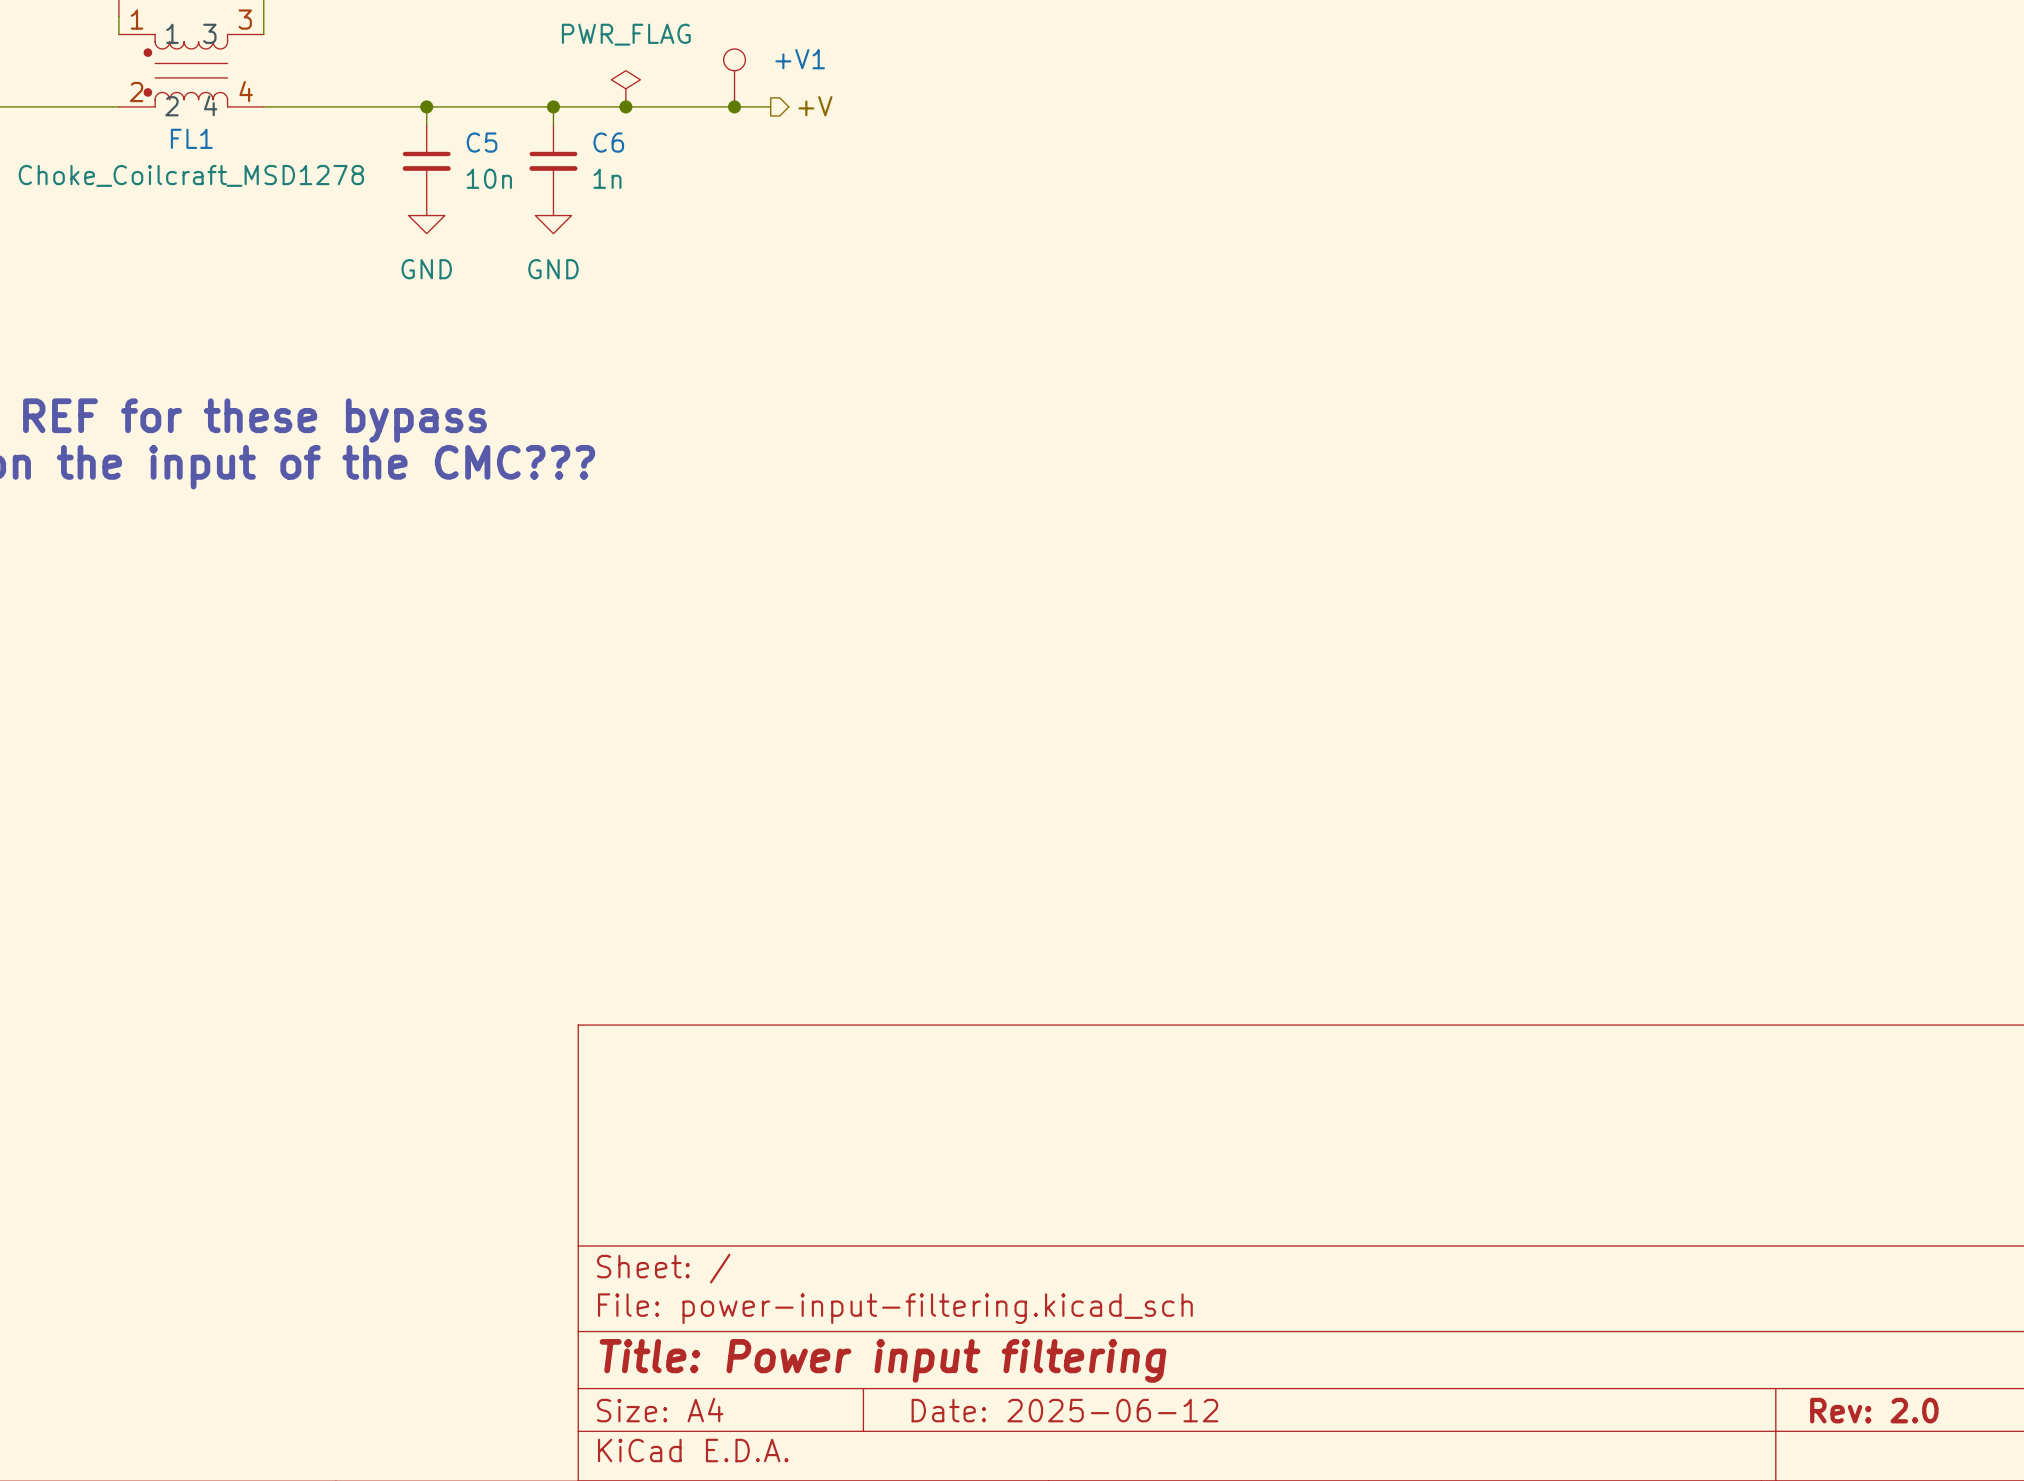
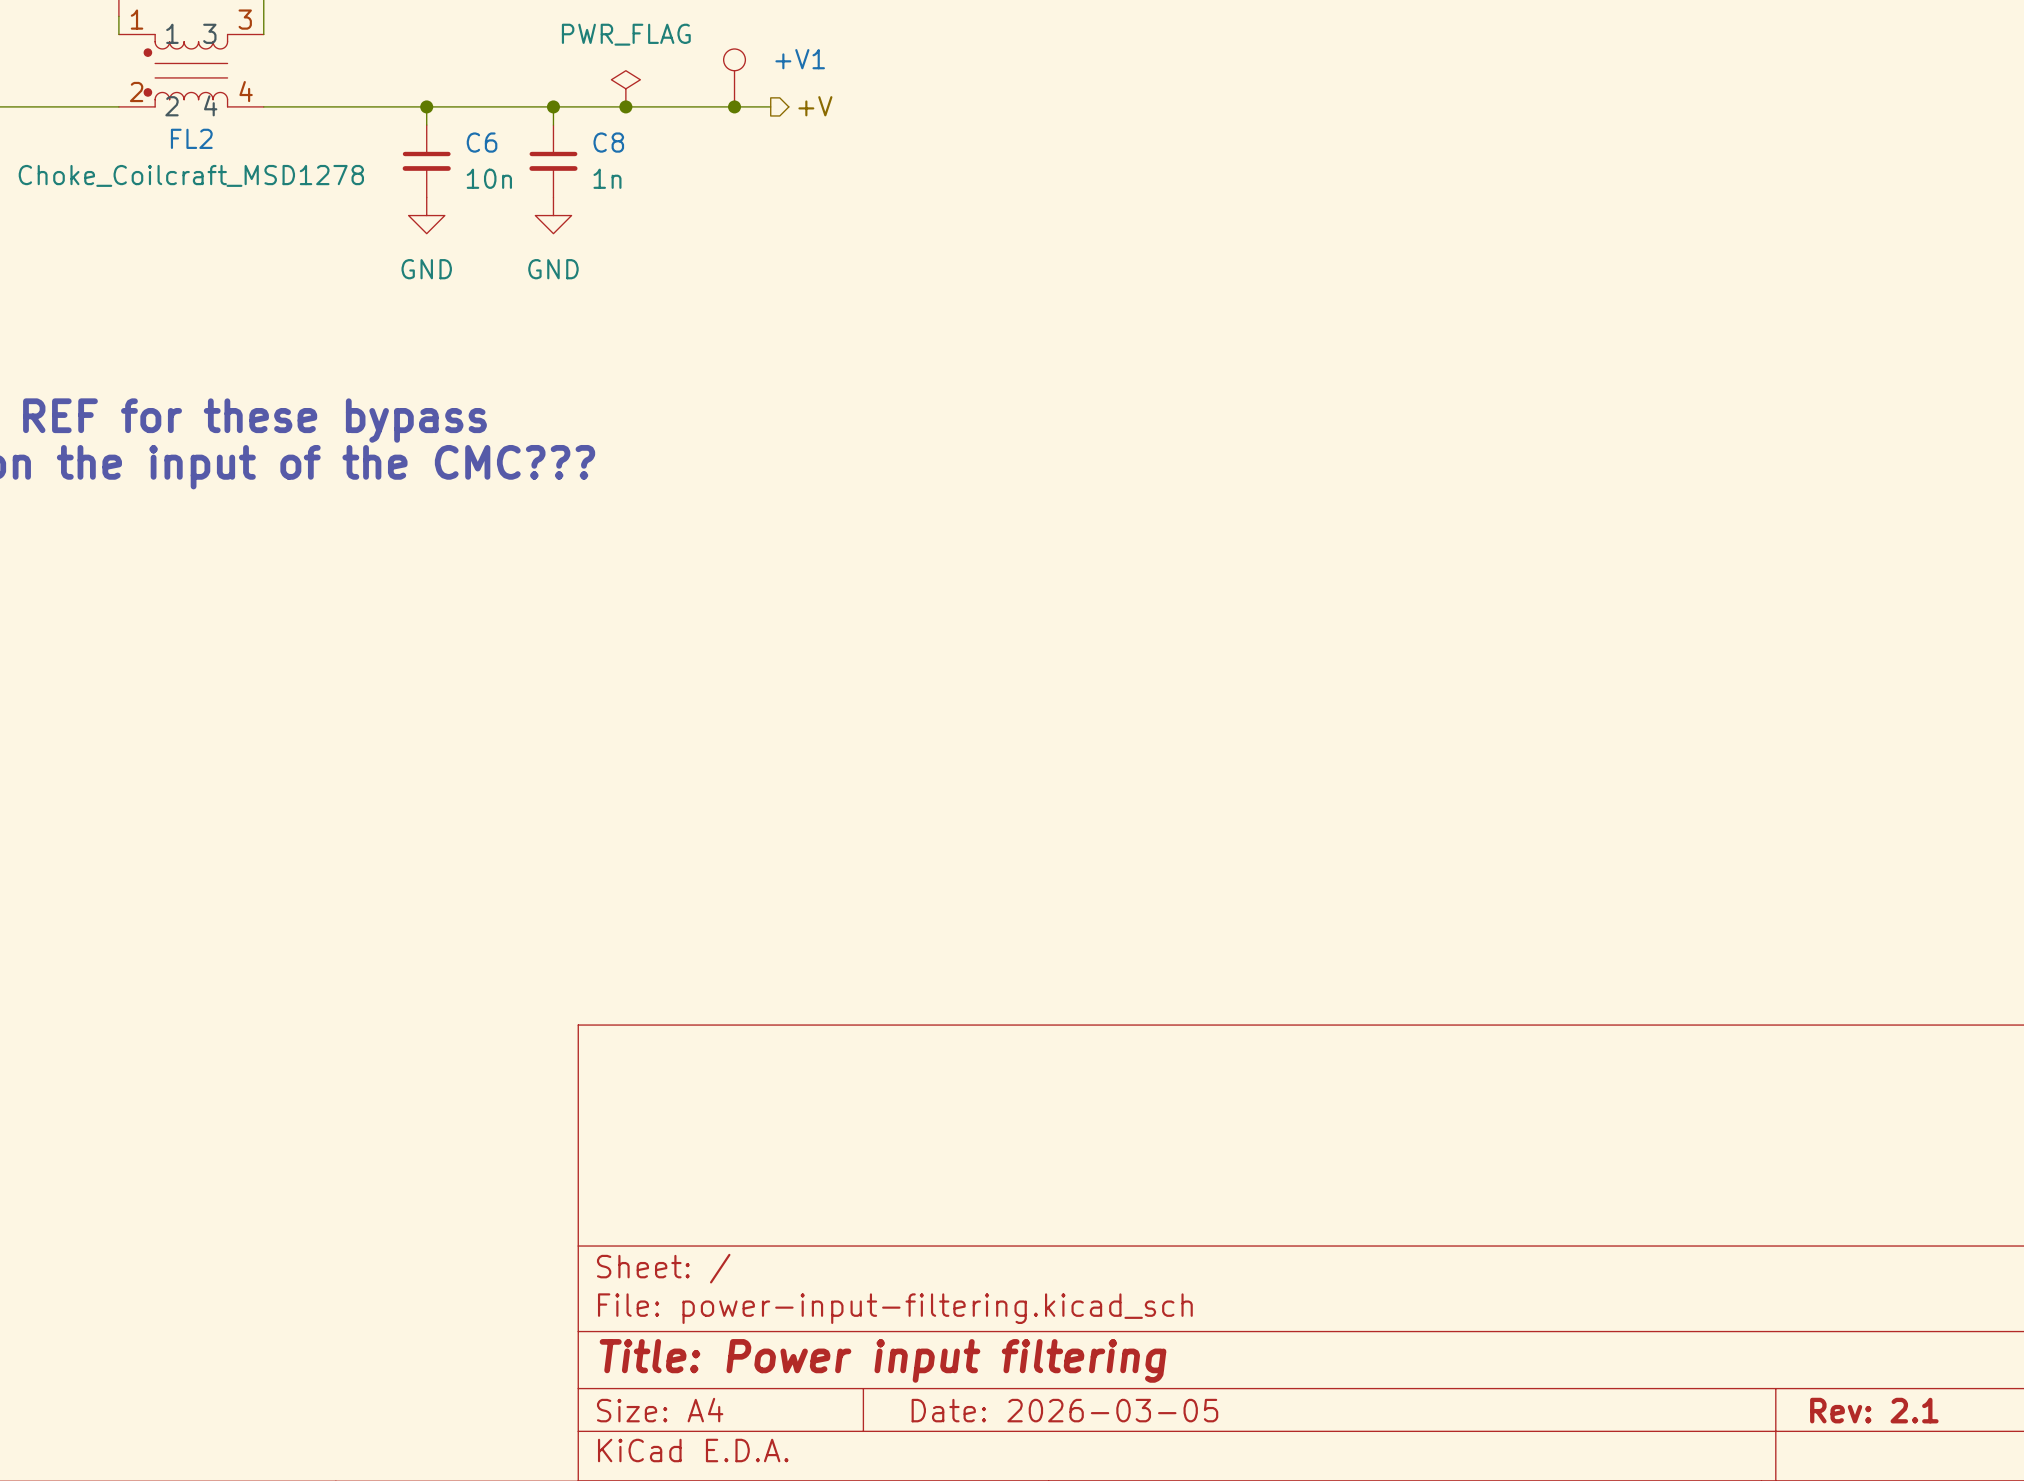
FL1 name: FL1 (191, 138) -> FL2 (191, 138)
C5 name: C5 (482, 142) -> C6 (482, 142)
C6 name: C6 (608, 142) -> C8 (608, 142)
title block: Date: 2025-06-12 (1064, 1410) -> Date: 2026-03-05 (1064, 1410)
title block: Rev: 2.0 (1874, 1410) -> Rev: 2.1 (1874, 1410)

